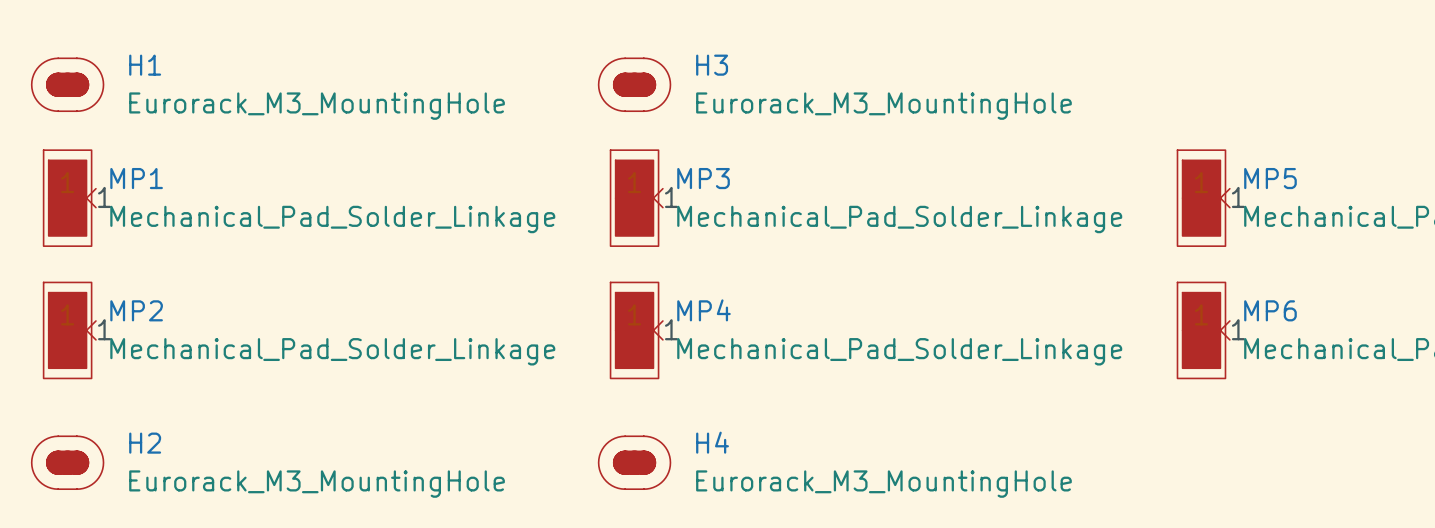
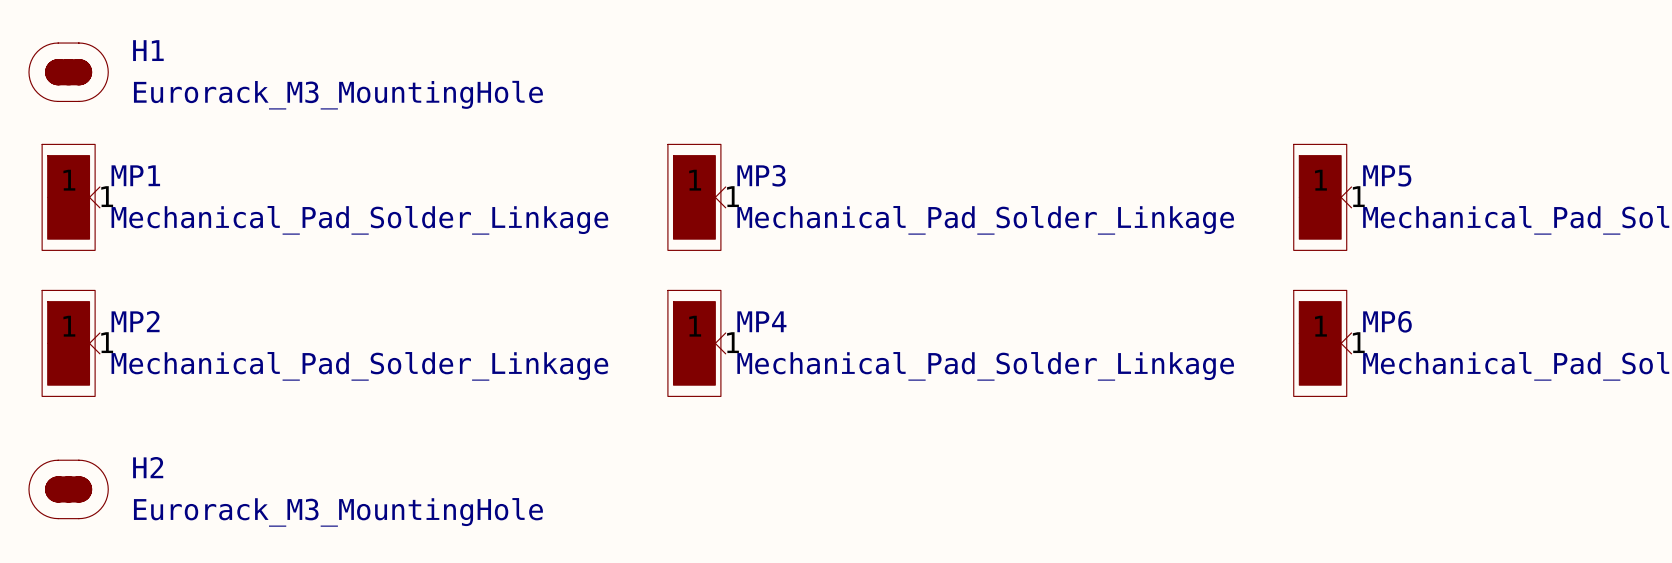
H3: Eurorack_M3_MountingHole (634, 84) -> none
H4: Eurorack_M3_MountingHole (634, 462) -> none

